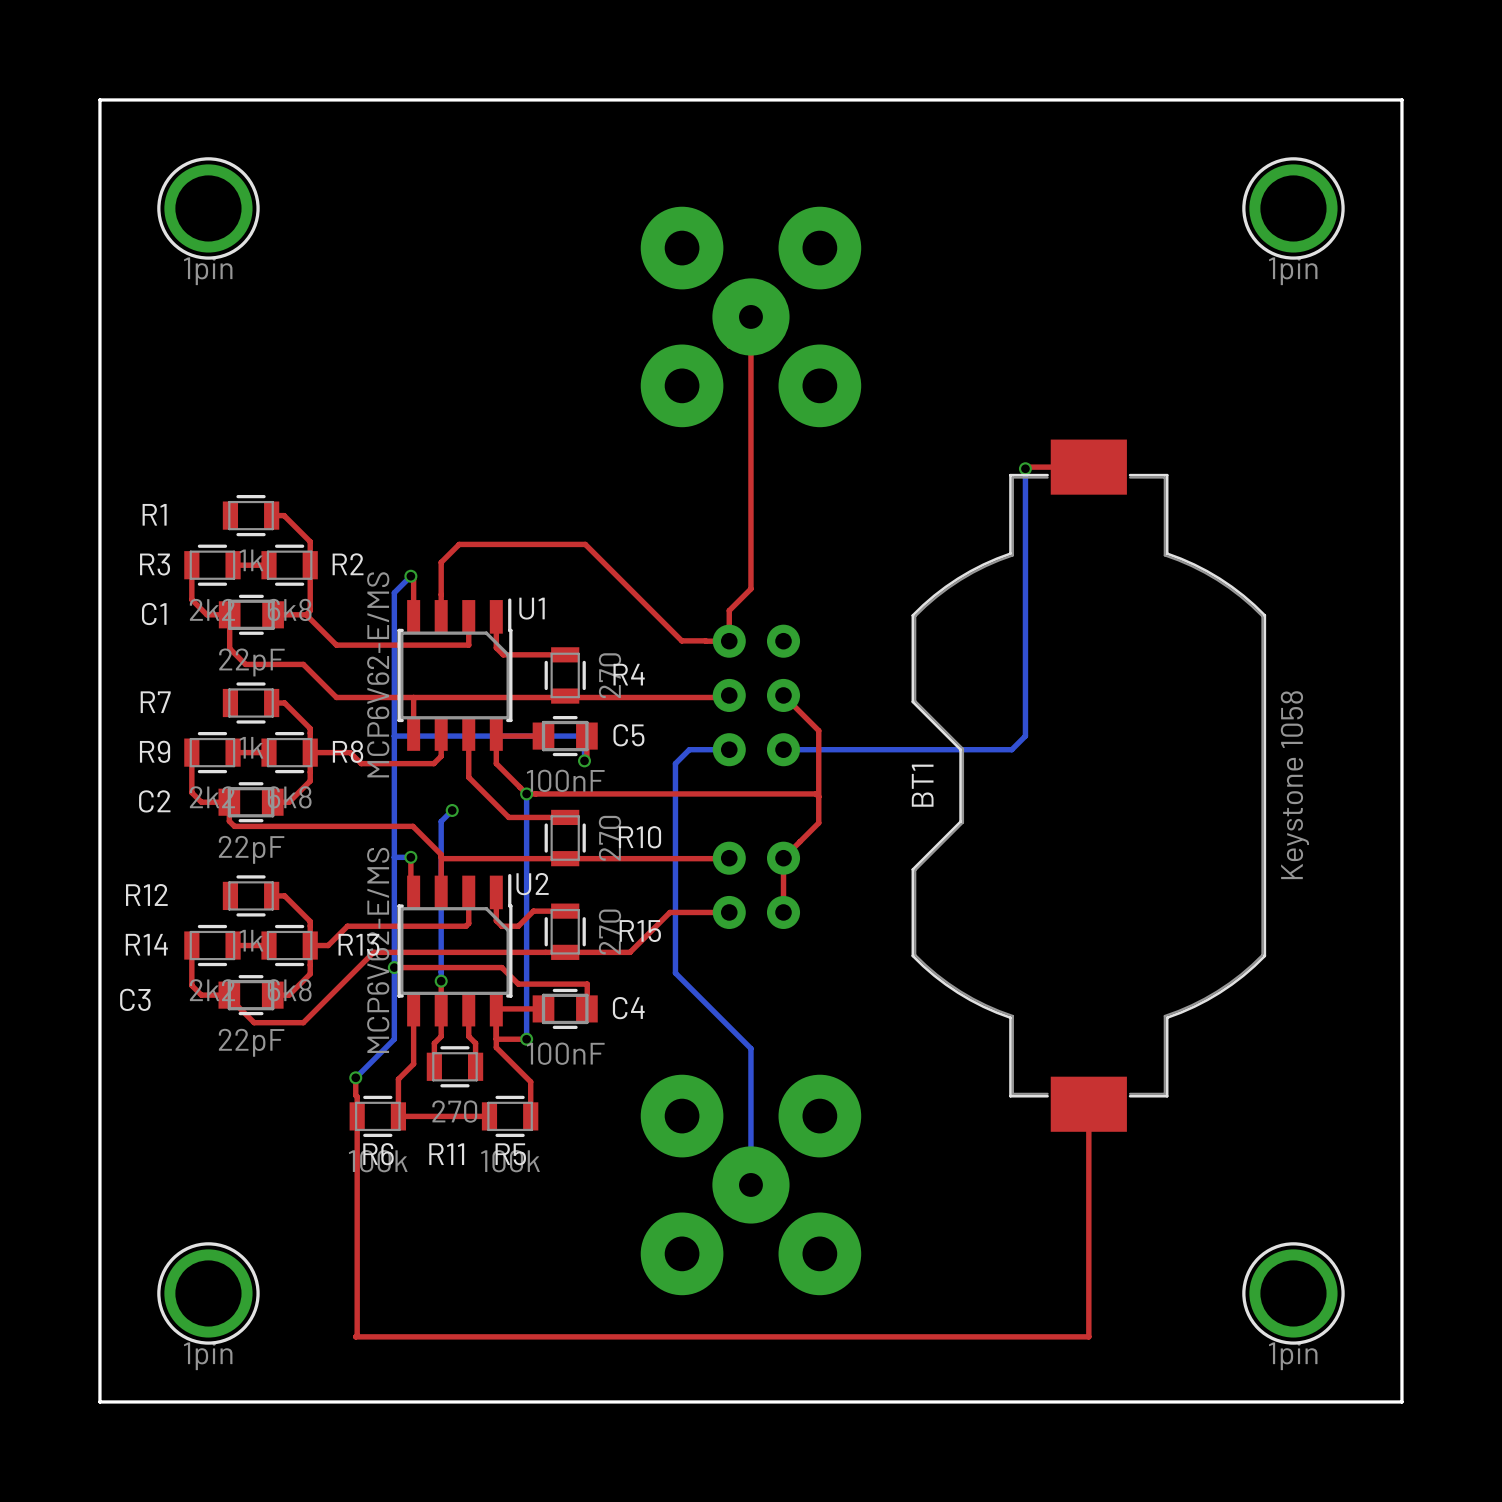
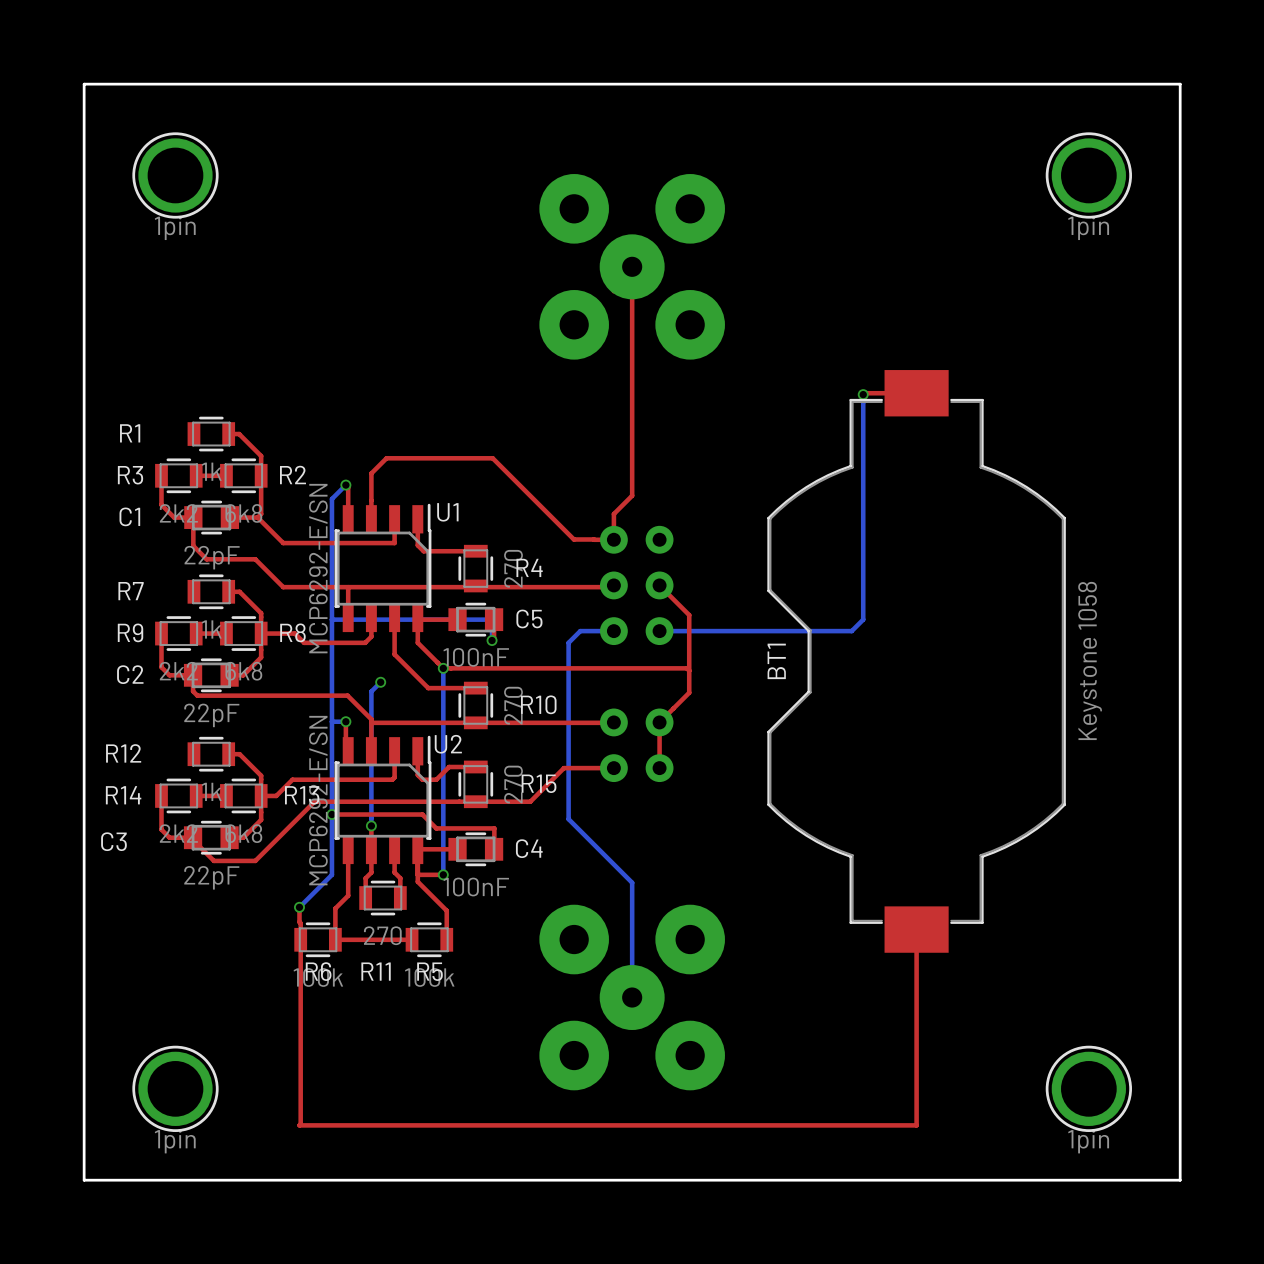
U1 value: MCP6V62-E/MS (378, 674) -> MCP6292-E/SN (318, 568)
U2 value: MCP6V62-E/MS (378, 950) -> MCP6292-E/SN (318, 800)

